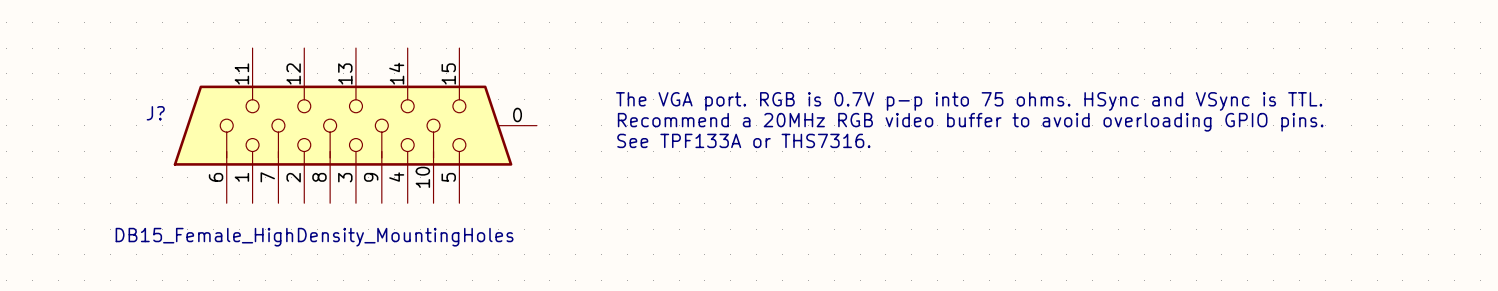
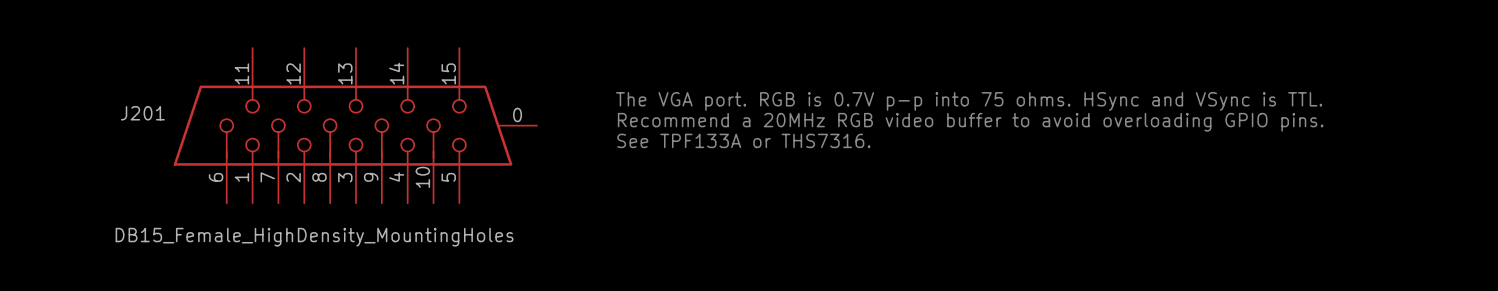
J? name: J? (155, 113) -> J201 (142, 113)

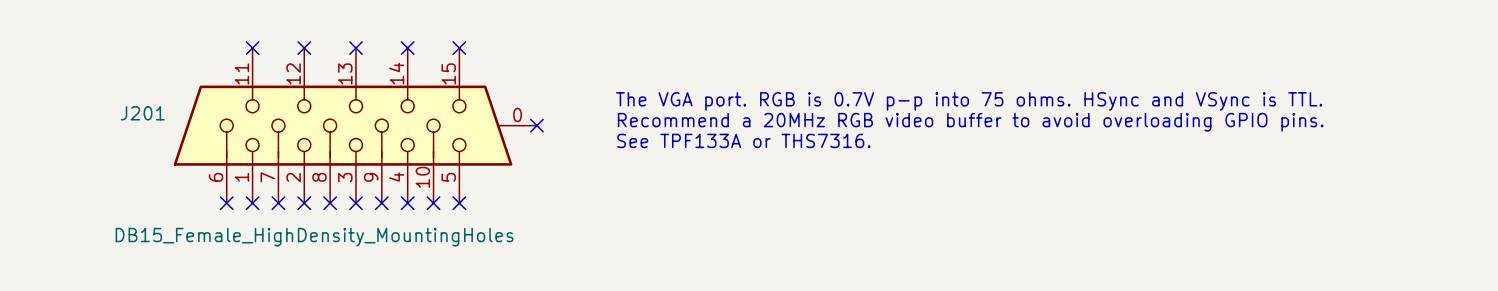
no-connect mark: none -> (252, 48)
no-connect mark: none -> (304, 48)
no-connect mark: none -> (355, 48)
no-connect mark: none -> (407, 48)
no-connect mark: none -> (459, 48)
no-connect mark: none -> (536, 125)
no-connect mark: none -> (226, 203)
no-connect mark: none -> (252, 203)
no-connect mark: none -> (278, 203)
no-connect mark: none -> (304, 203)
no-connect mark: none -> (330, 203)
no-connect mark: none -> (355, 203)
no-connect mark: none -> (381, 203)
no-connect mark: none -> (407, 203)
no-connect mark: none -> (433, 203)
no-connect mark: none -> (459, 203)

